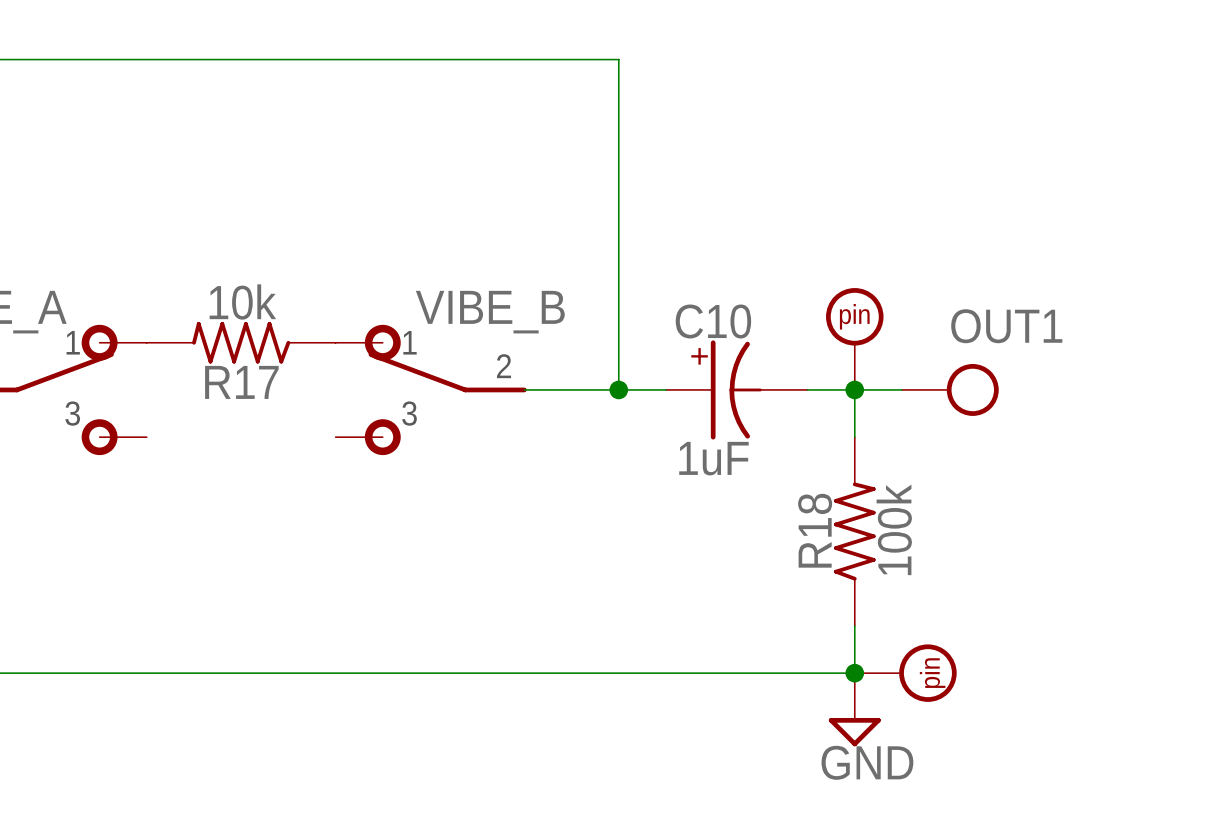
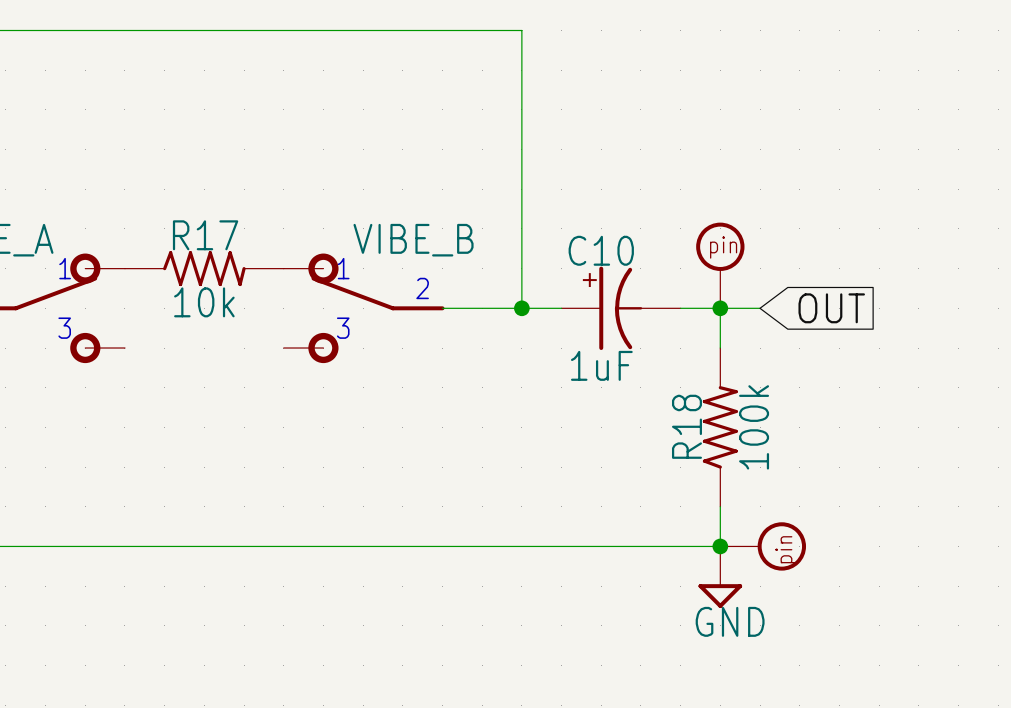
R17 rotation: 0° (241, 342) -> 180° (204, 268)
OUT1: (950, 389) -> none
global label: none -> OUT (831, 308)

